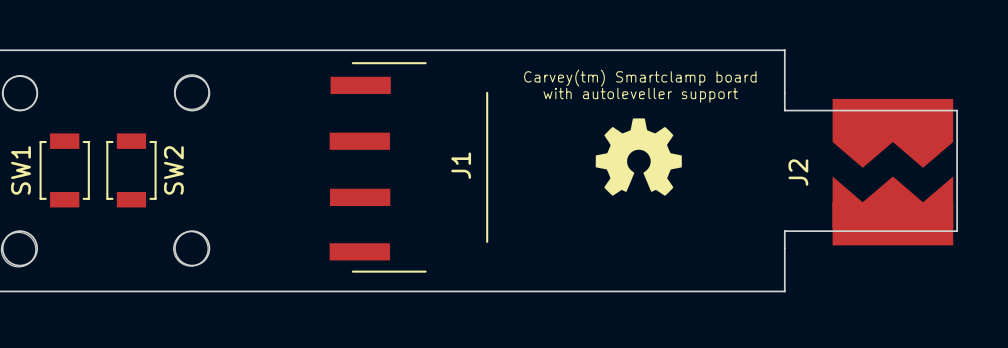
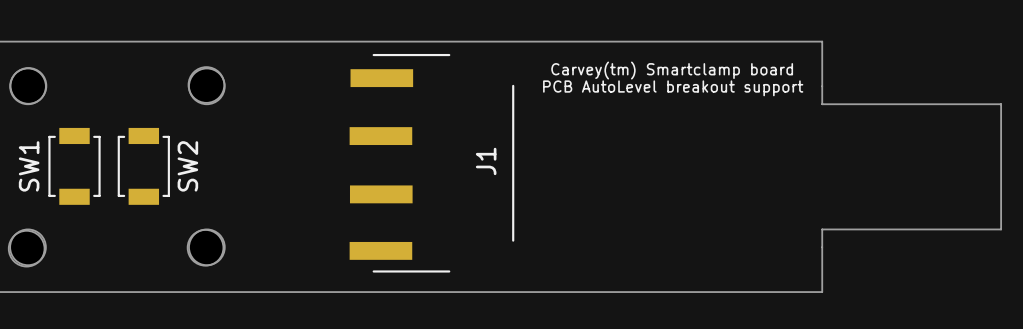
text: with autoleveller support (640, 95) -> PCB AutoLevel breakout support (673, 88)
drawing: [595, 118, 682, 196] -> none
J2: (892, 172) -> none

